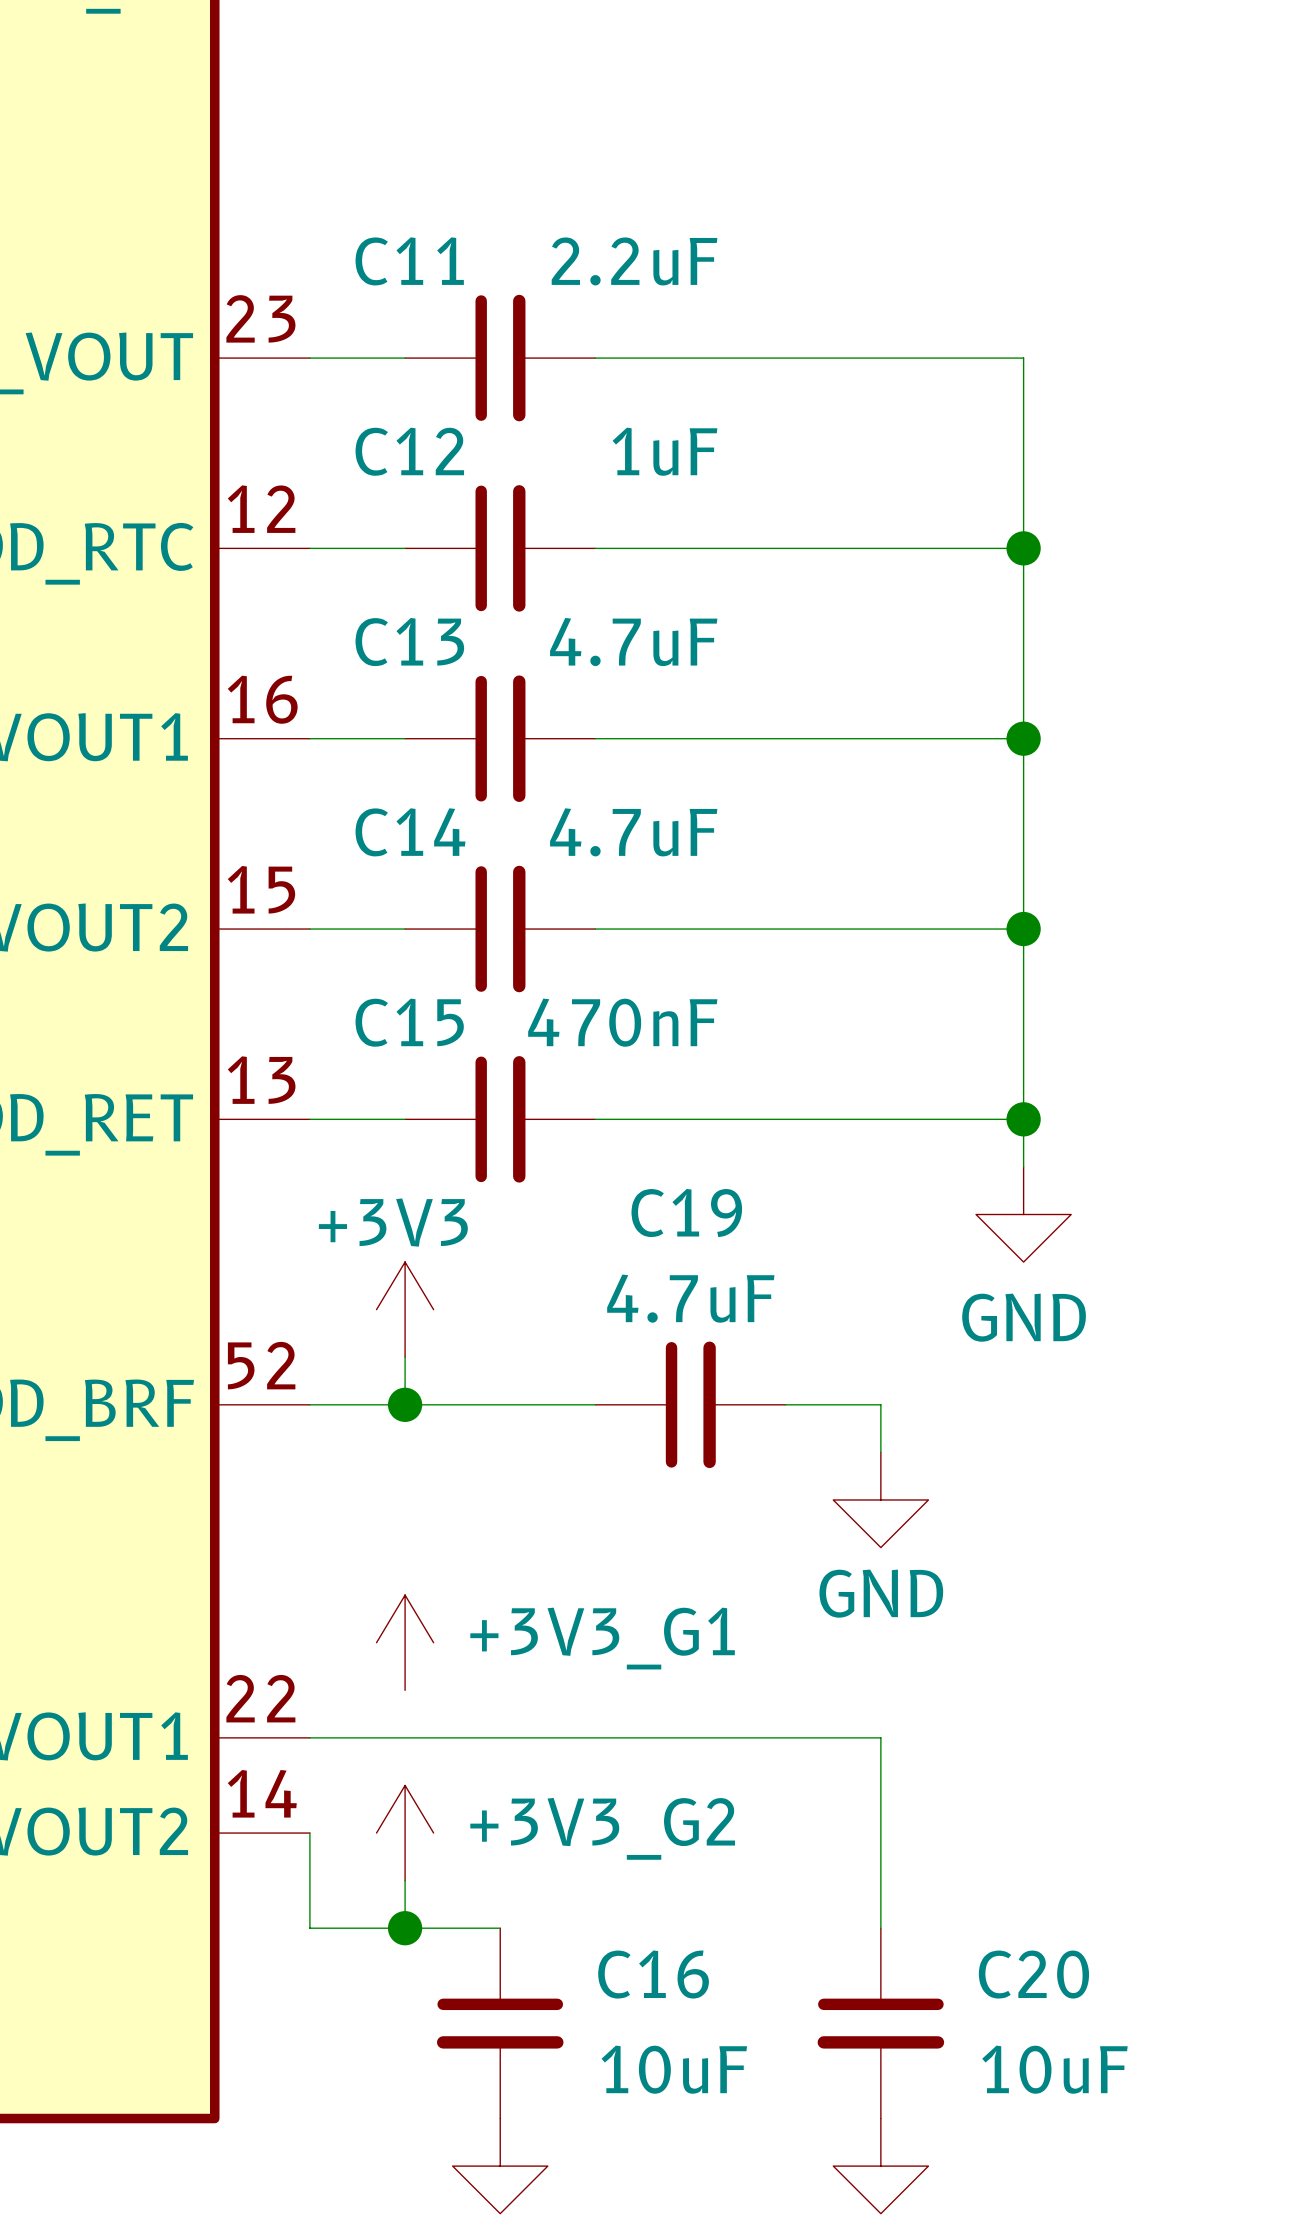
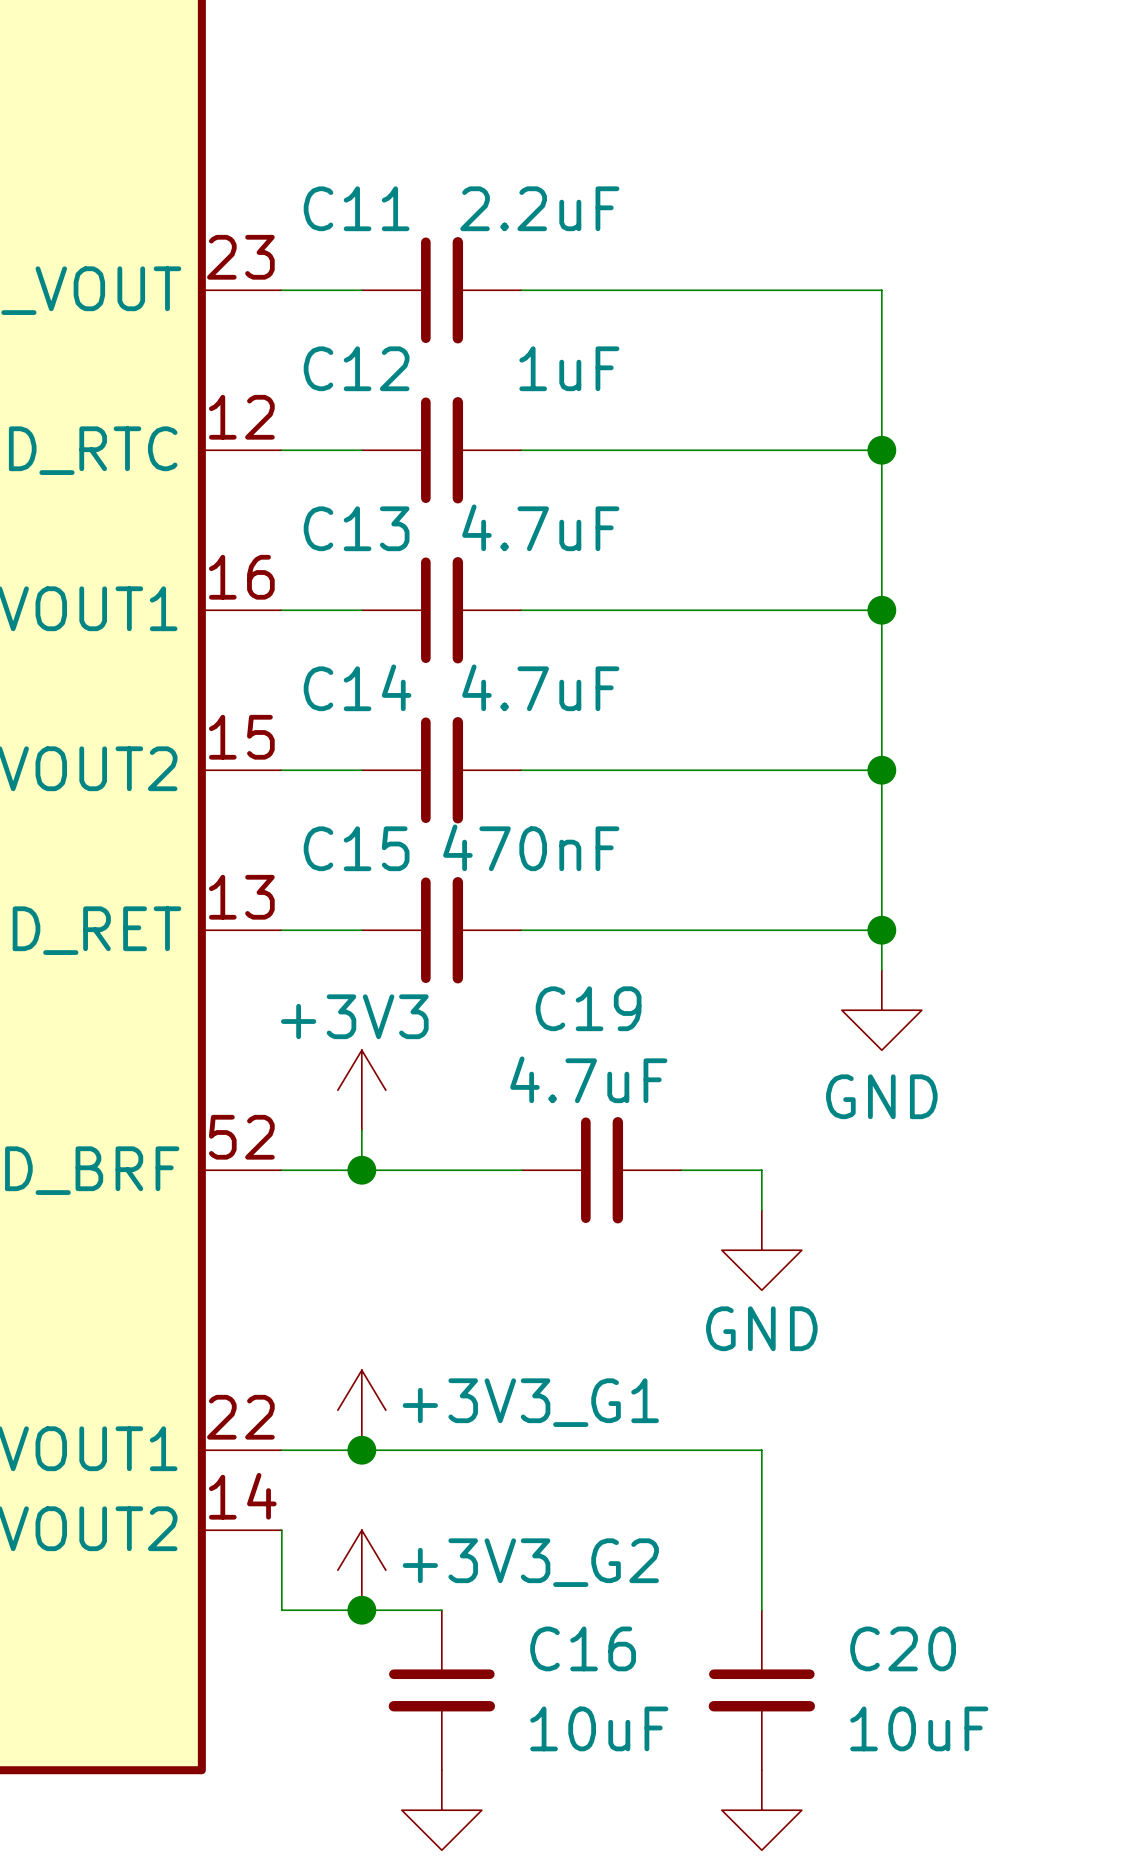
power symbol position: +3V3_G1 (405, 1642) -> +3V3_G1 (361, 1410)
junction: none -> (361, 1450)
power symbol position: +3V3_G2 (405, 1833) -> +3V3_G2 (361, 1570)

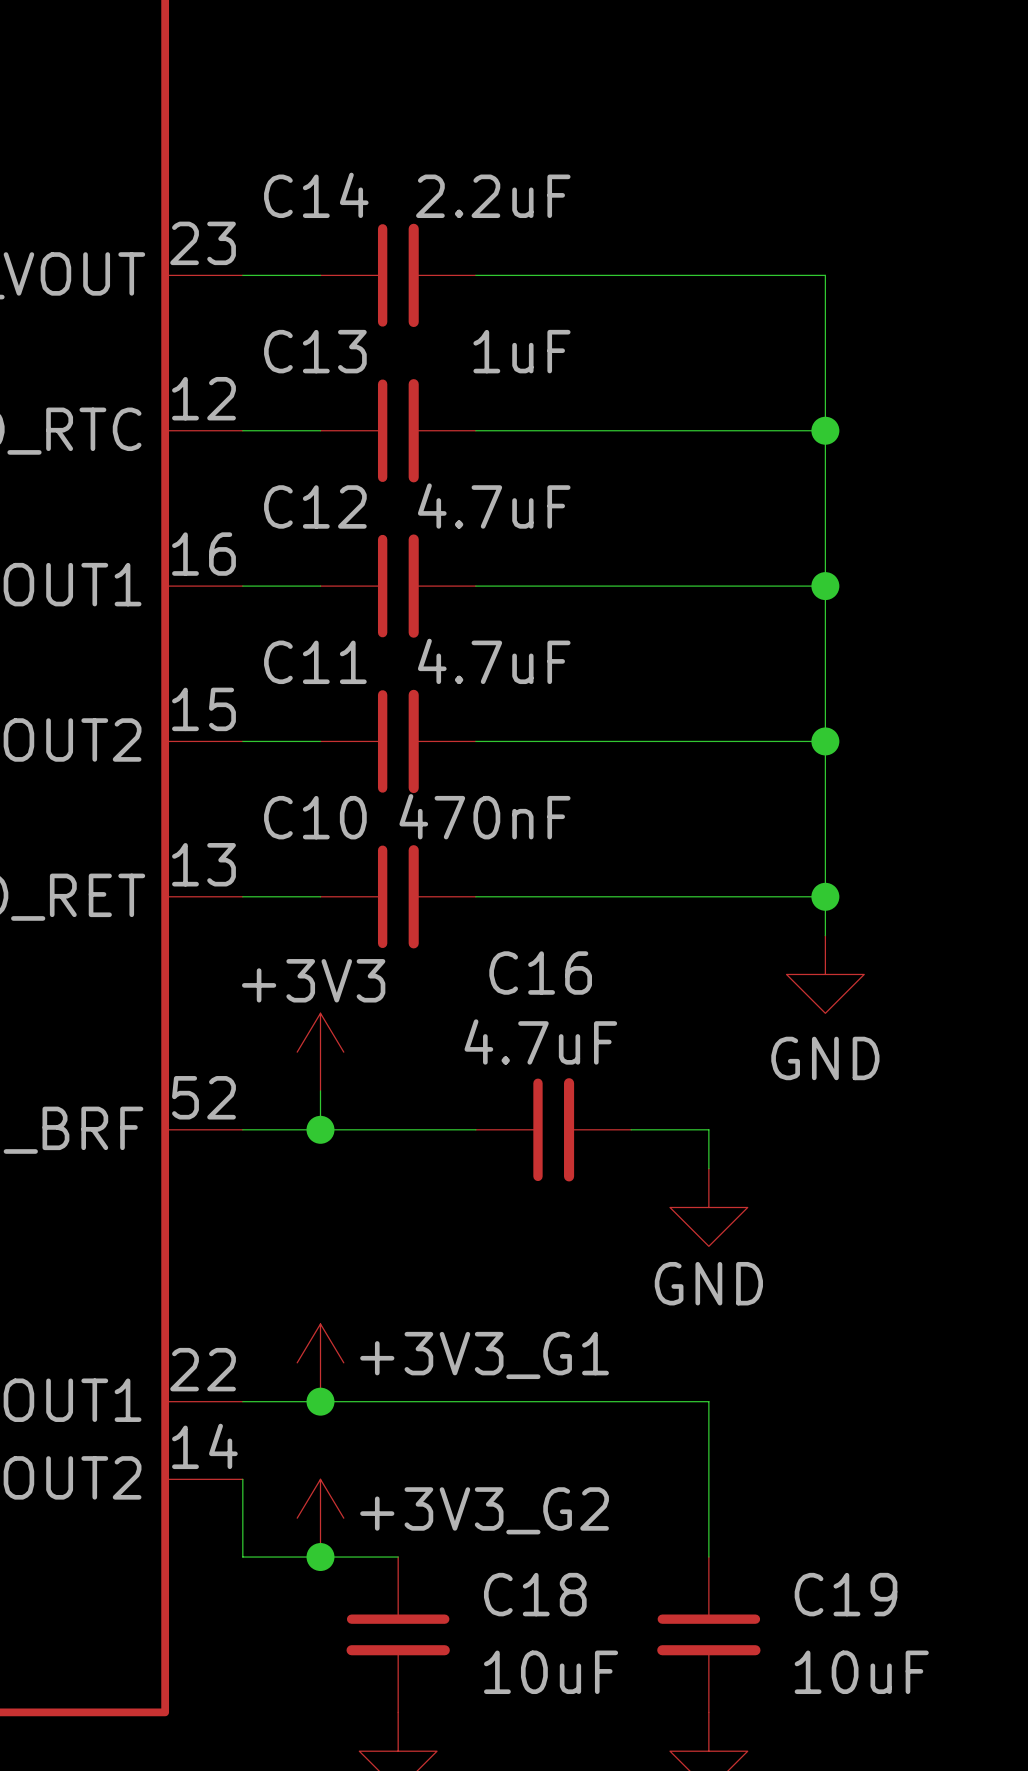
C11 name: C11 (356, 208) -> C14 (316, 195)
C12 name: C12 (356, 368) -> C13 (315, 351)
C13 name: C13 (356, 528) -> C12 (315, 506)
C14 name: C14 (357, 687) -> C11 (315, 662)
C15 name: C15 (356, 848) -> C10 (315, 817)
C19 name: C19 (588, 1008) -> C16 (540, 973)
C16 name: C16 (583, 1648) -> C18 (535, 1594)
C20 name: C20 (903, 1648) -> C19 (846, 1594)

